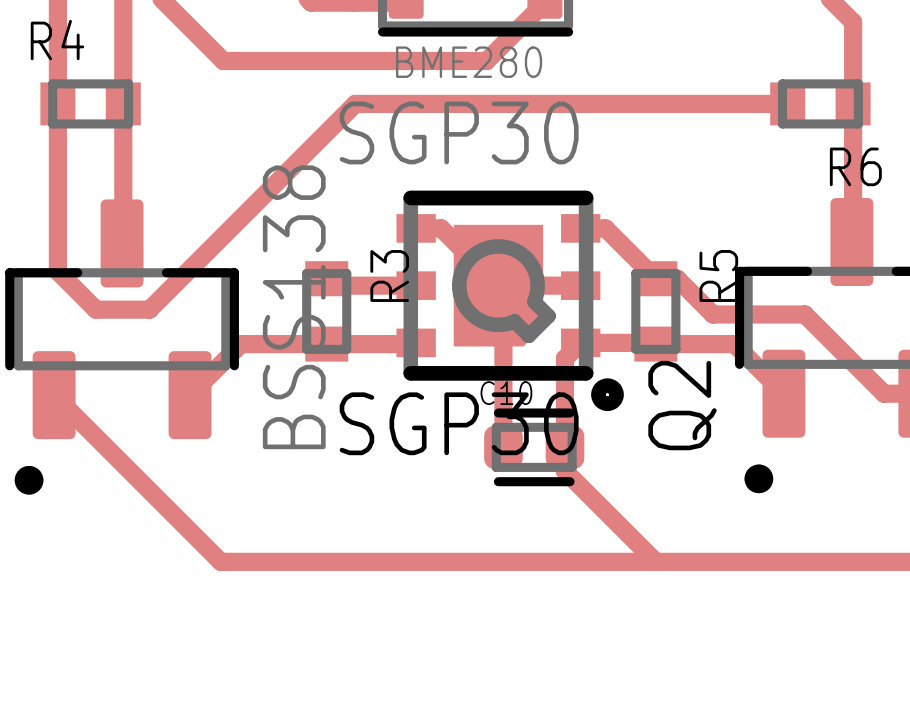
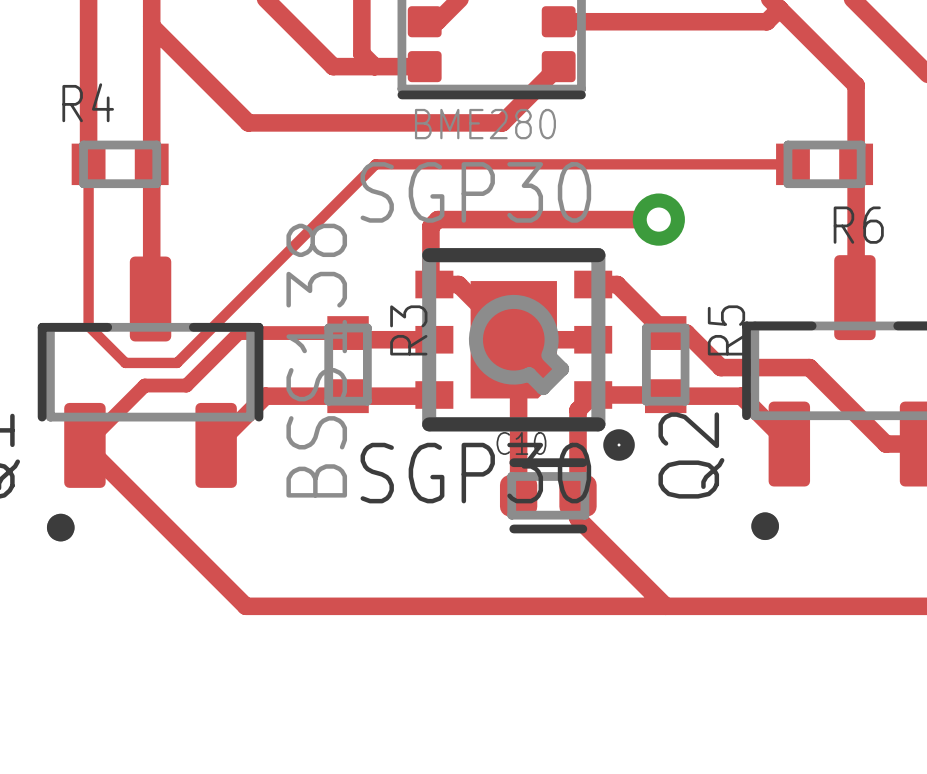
track width: thick (57, 103) (57, 271) (96, 309) (149, 309) (355, 103) (787, 103) -> thin (88, 164) (88, 326) (125, 362) (177, 362) (375, 164) (792, 164)
track: none -> (658, 219) (437, 219) (430, 226) (430, 281) (434, 284)
via: none -> (658, 219)
track: none -> (348, 333) (238, 333) (186, 385) (144, 385) (84, 445)

